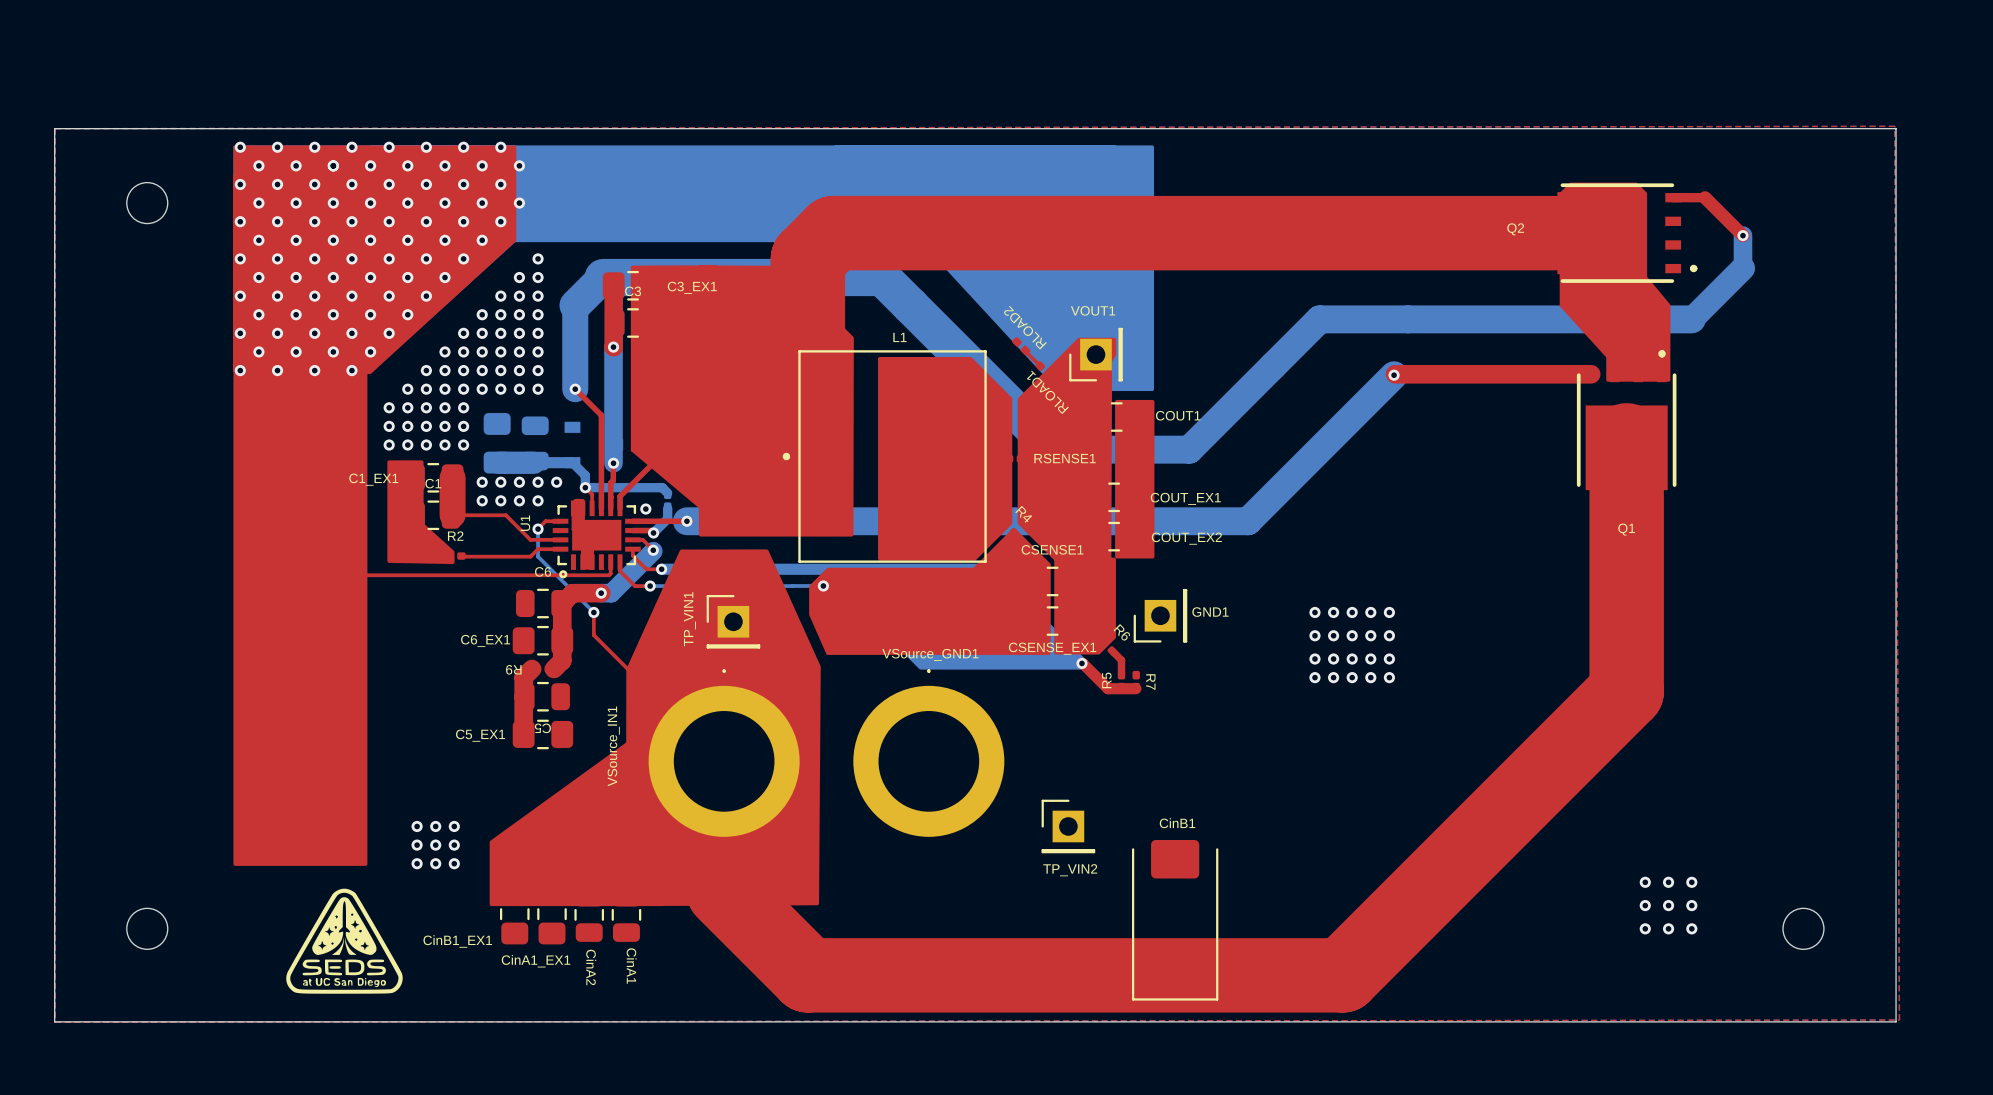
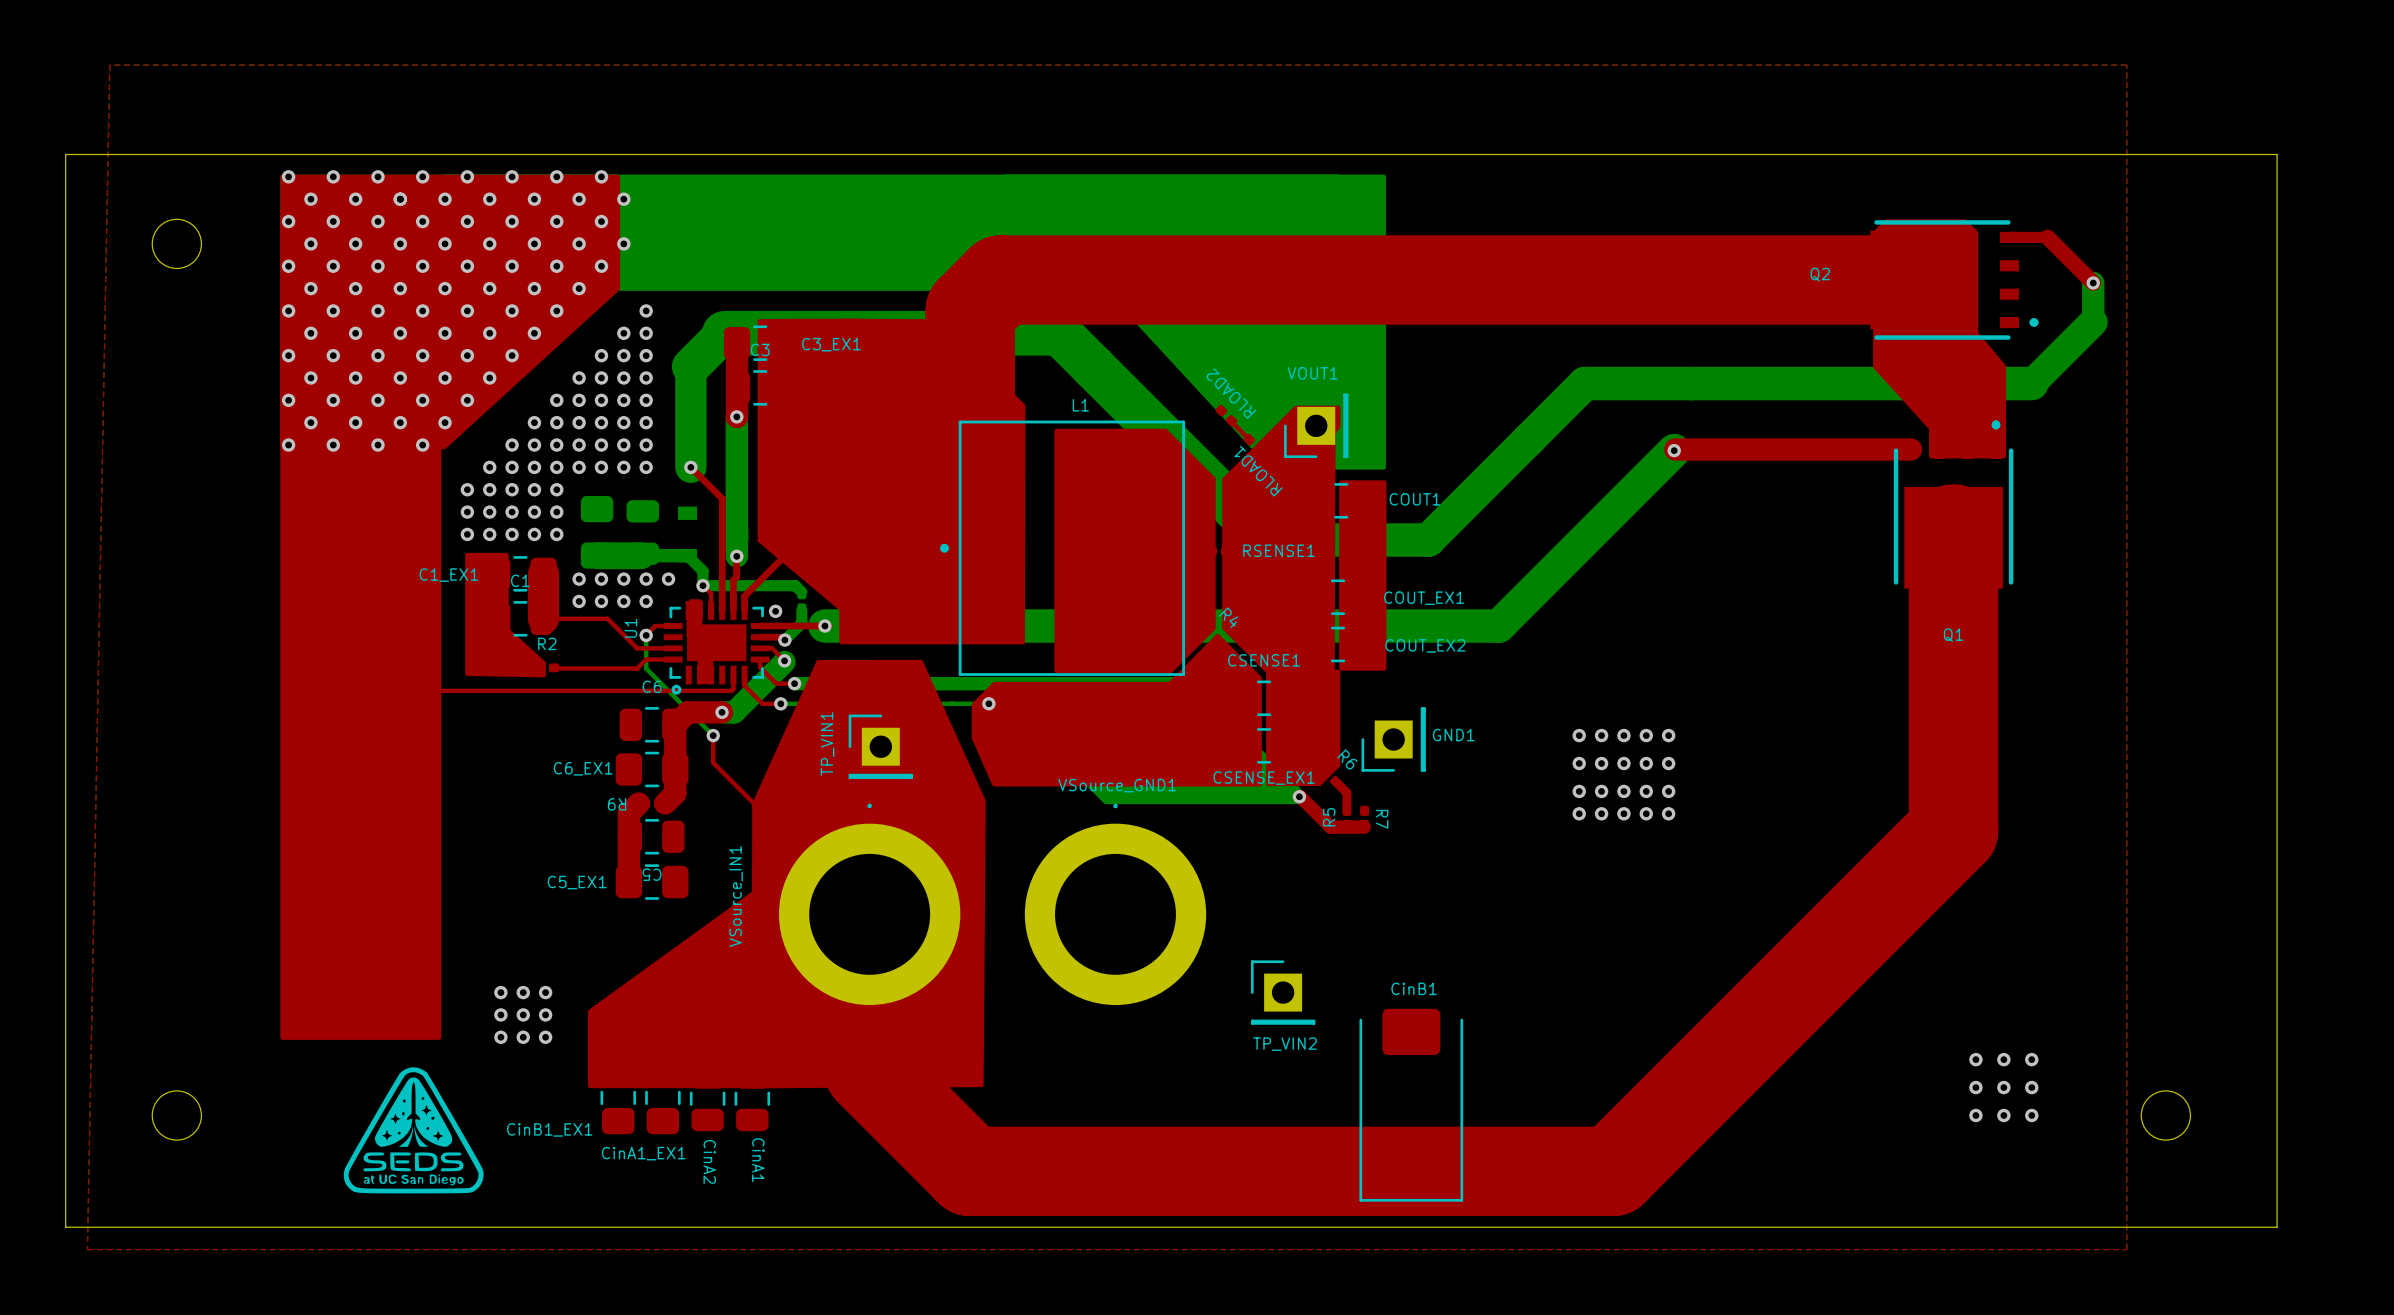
top zone outline: (1894, 126) (1899, 1020) (55, 1022) (55, 128) (1894, 126) -> (109, 65) (87, 1249) (2126, 1249) (2126, 65) (109, 65)

